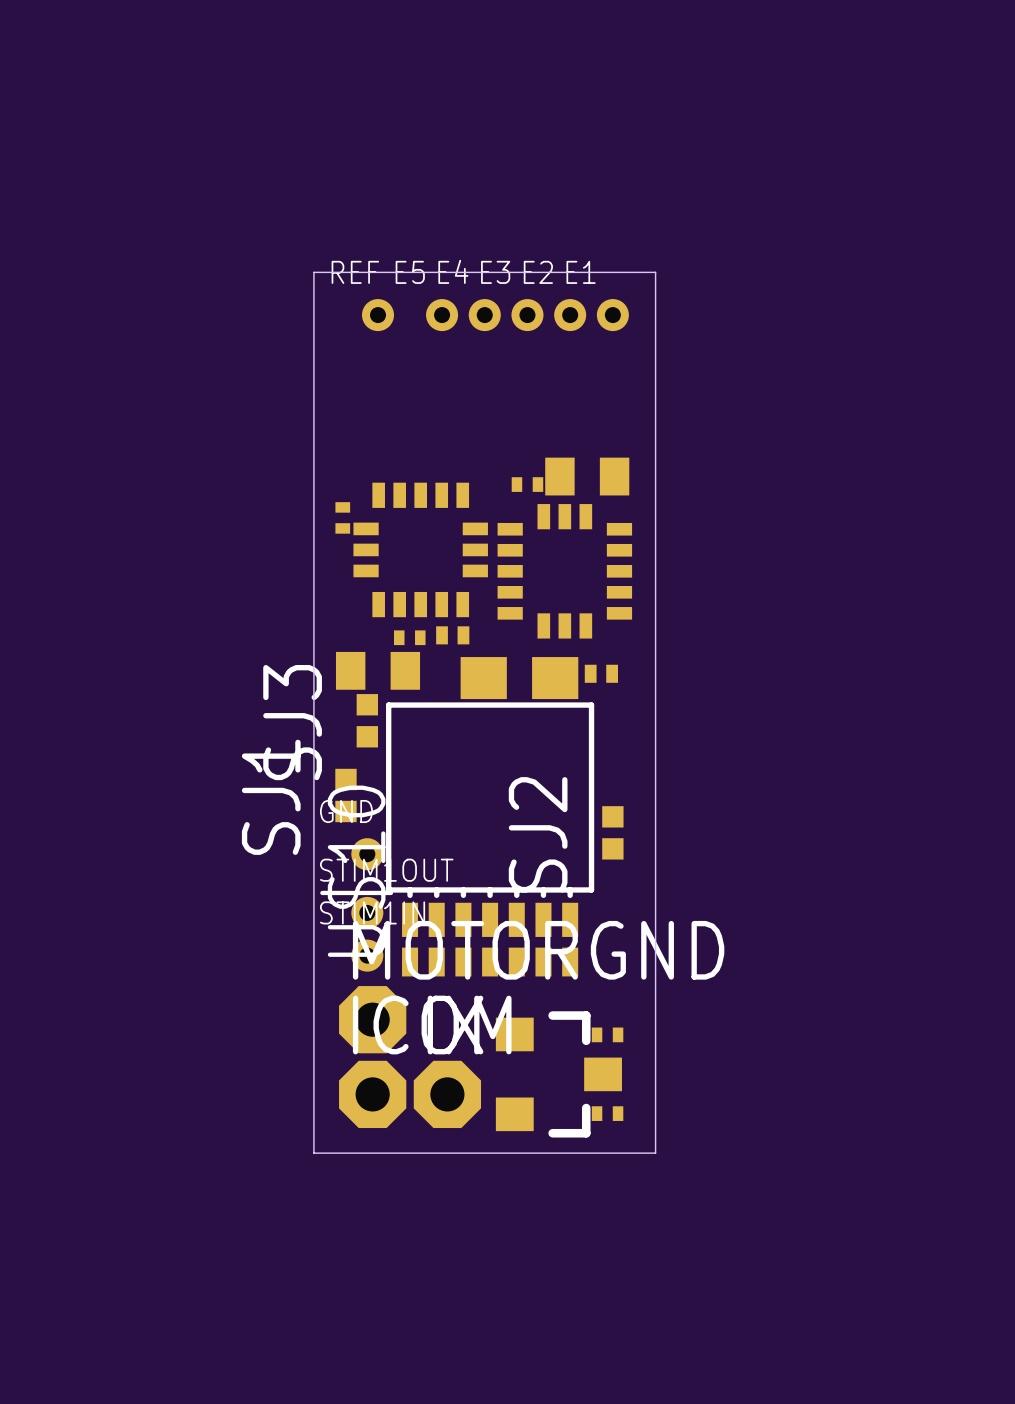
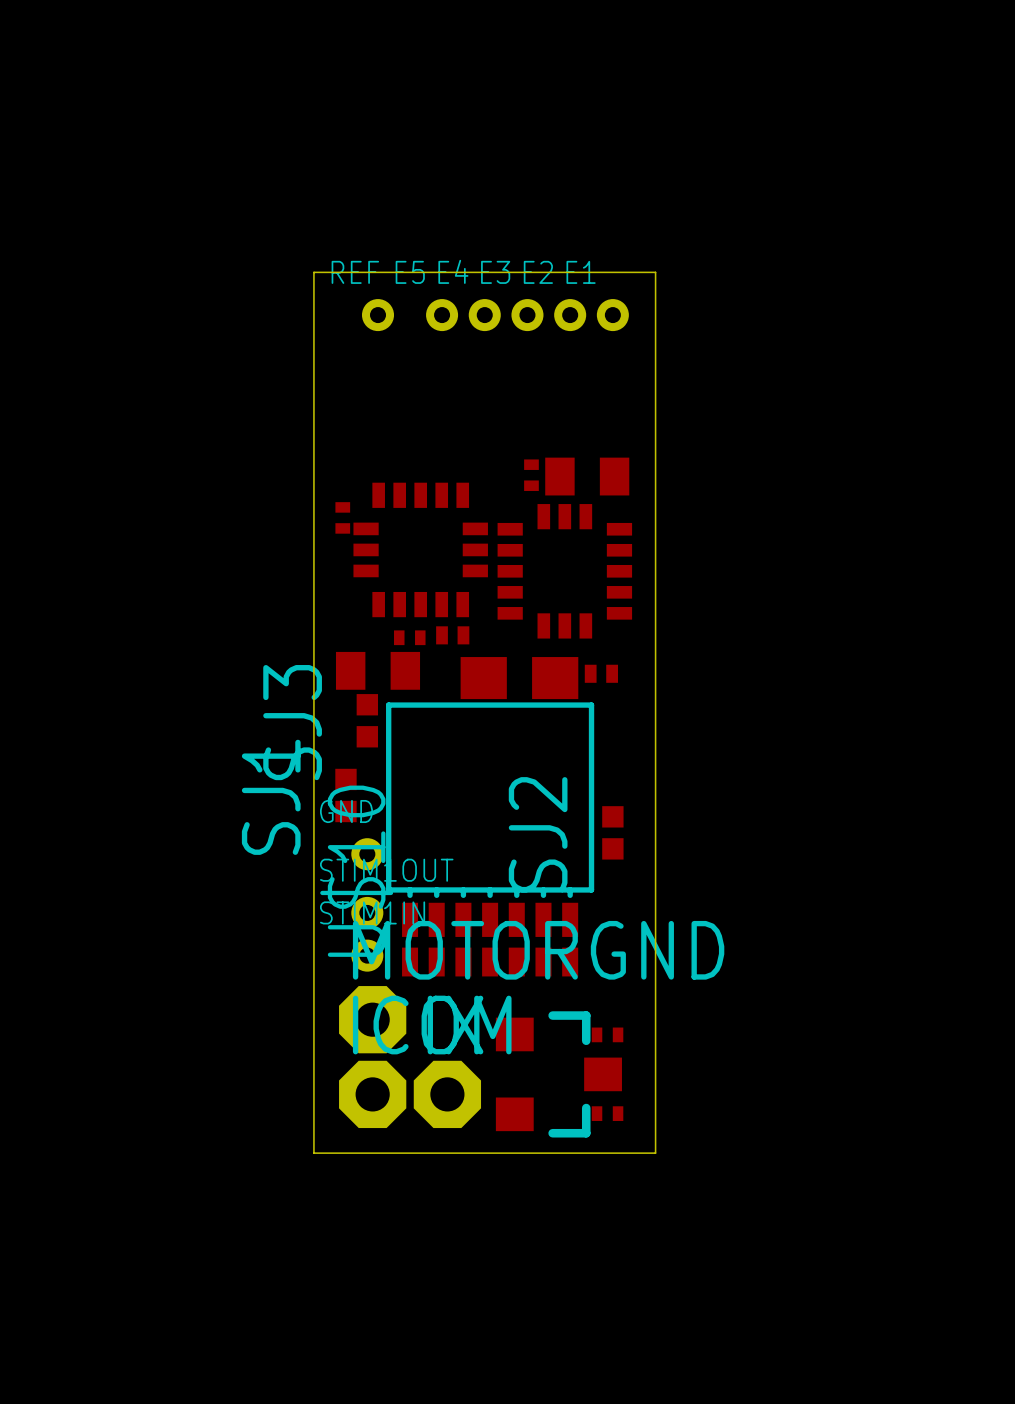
part rotation: 0° (527, 484) -> 90° clockwise (531, 475)

